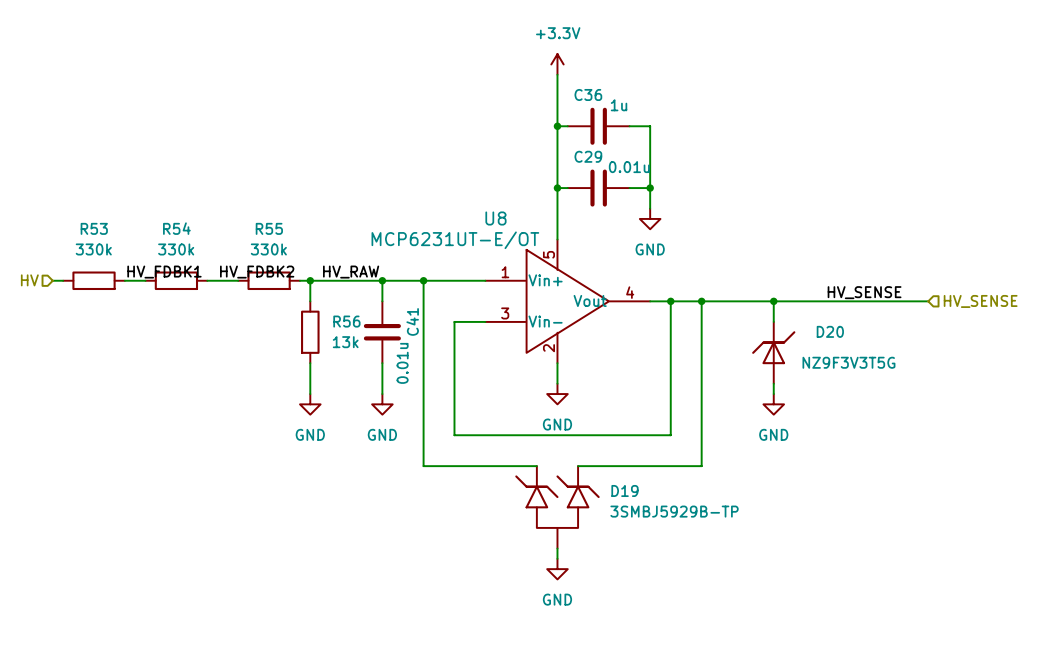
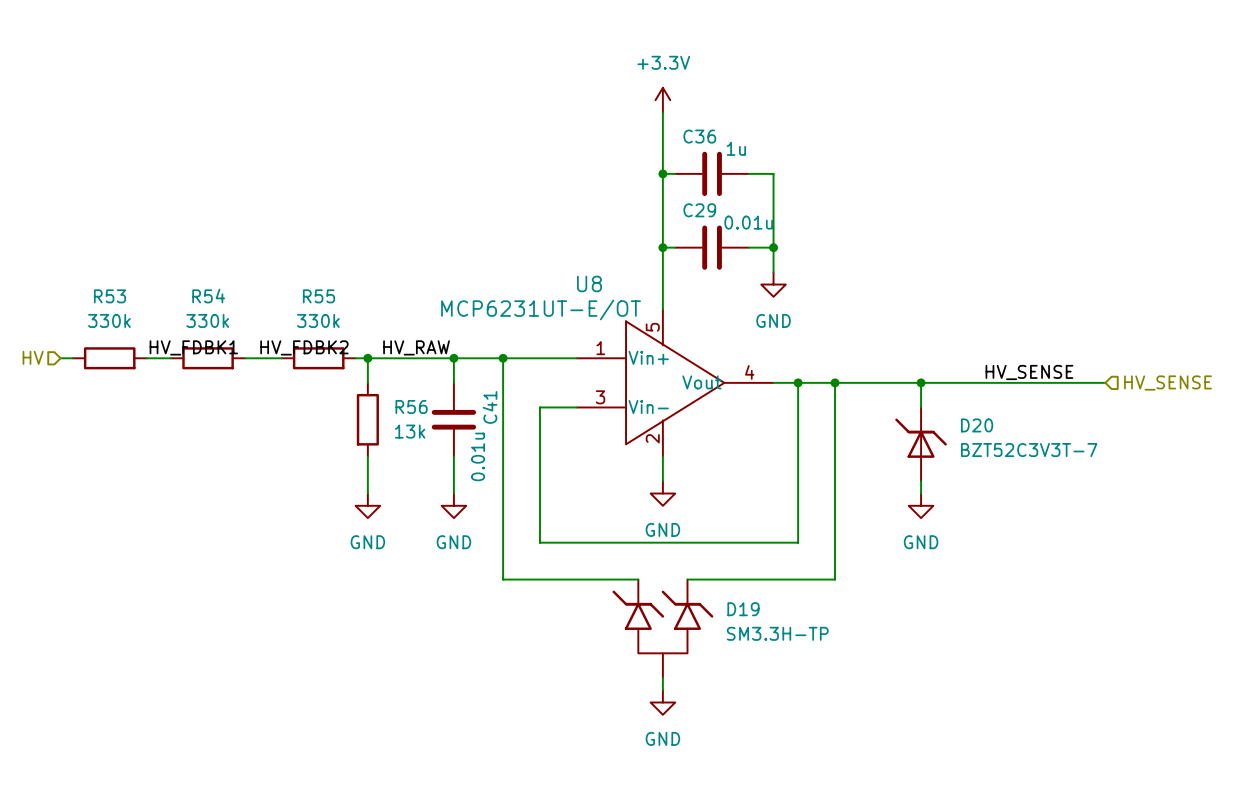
D20 flip: as is (773, 347) -> left-right (921, 438)
D20 value: NZ9F3V3T5G (848, 362) -> BZT52C3V3T-7 (1029, 450)
D19 value: 3SMBJ5929B-TP (674, 511) -> SM3.3H-TP (777, 633)

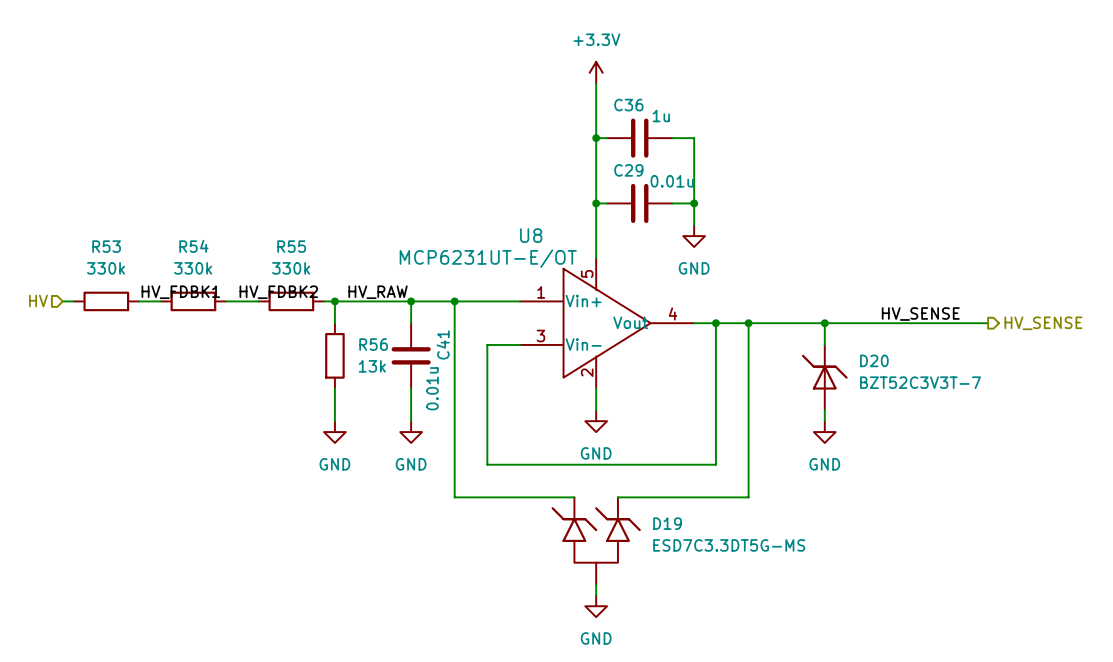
hierarchical label shape: input (1167, 383) -> output (1043, 323)
D19 value: SM3.3H-TP (777, 633) -> ESD7C3.3DT5G-MS (729, 545)

